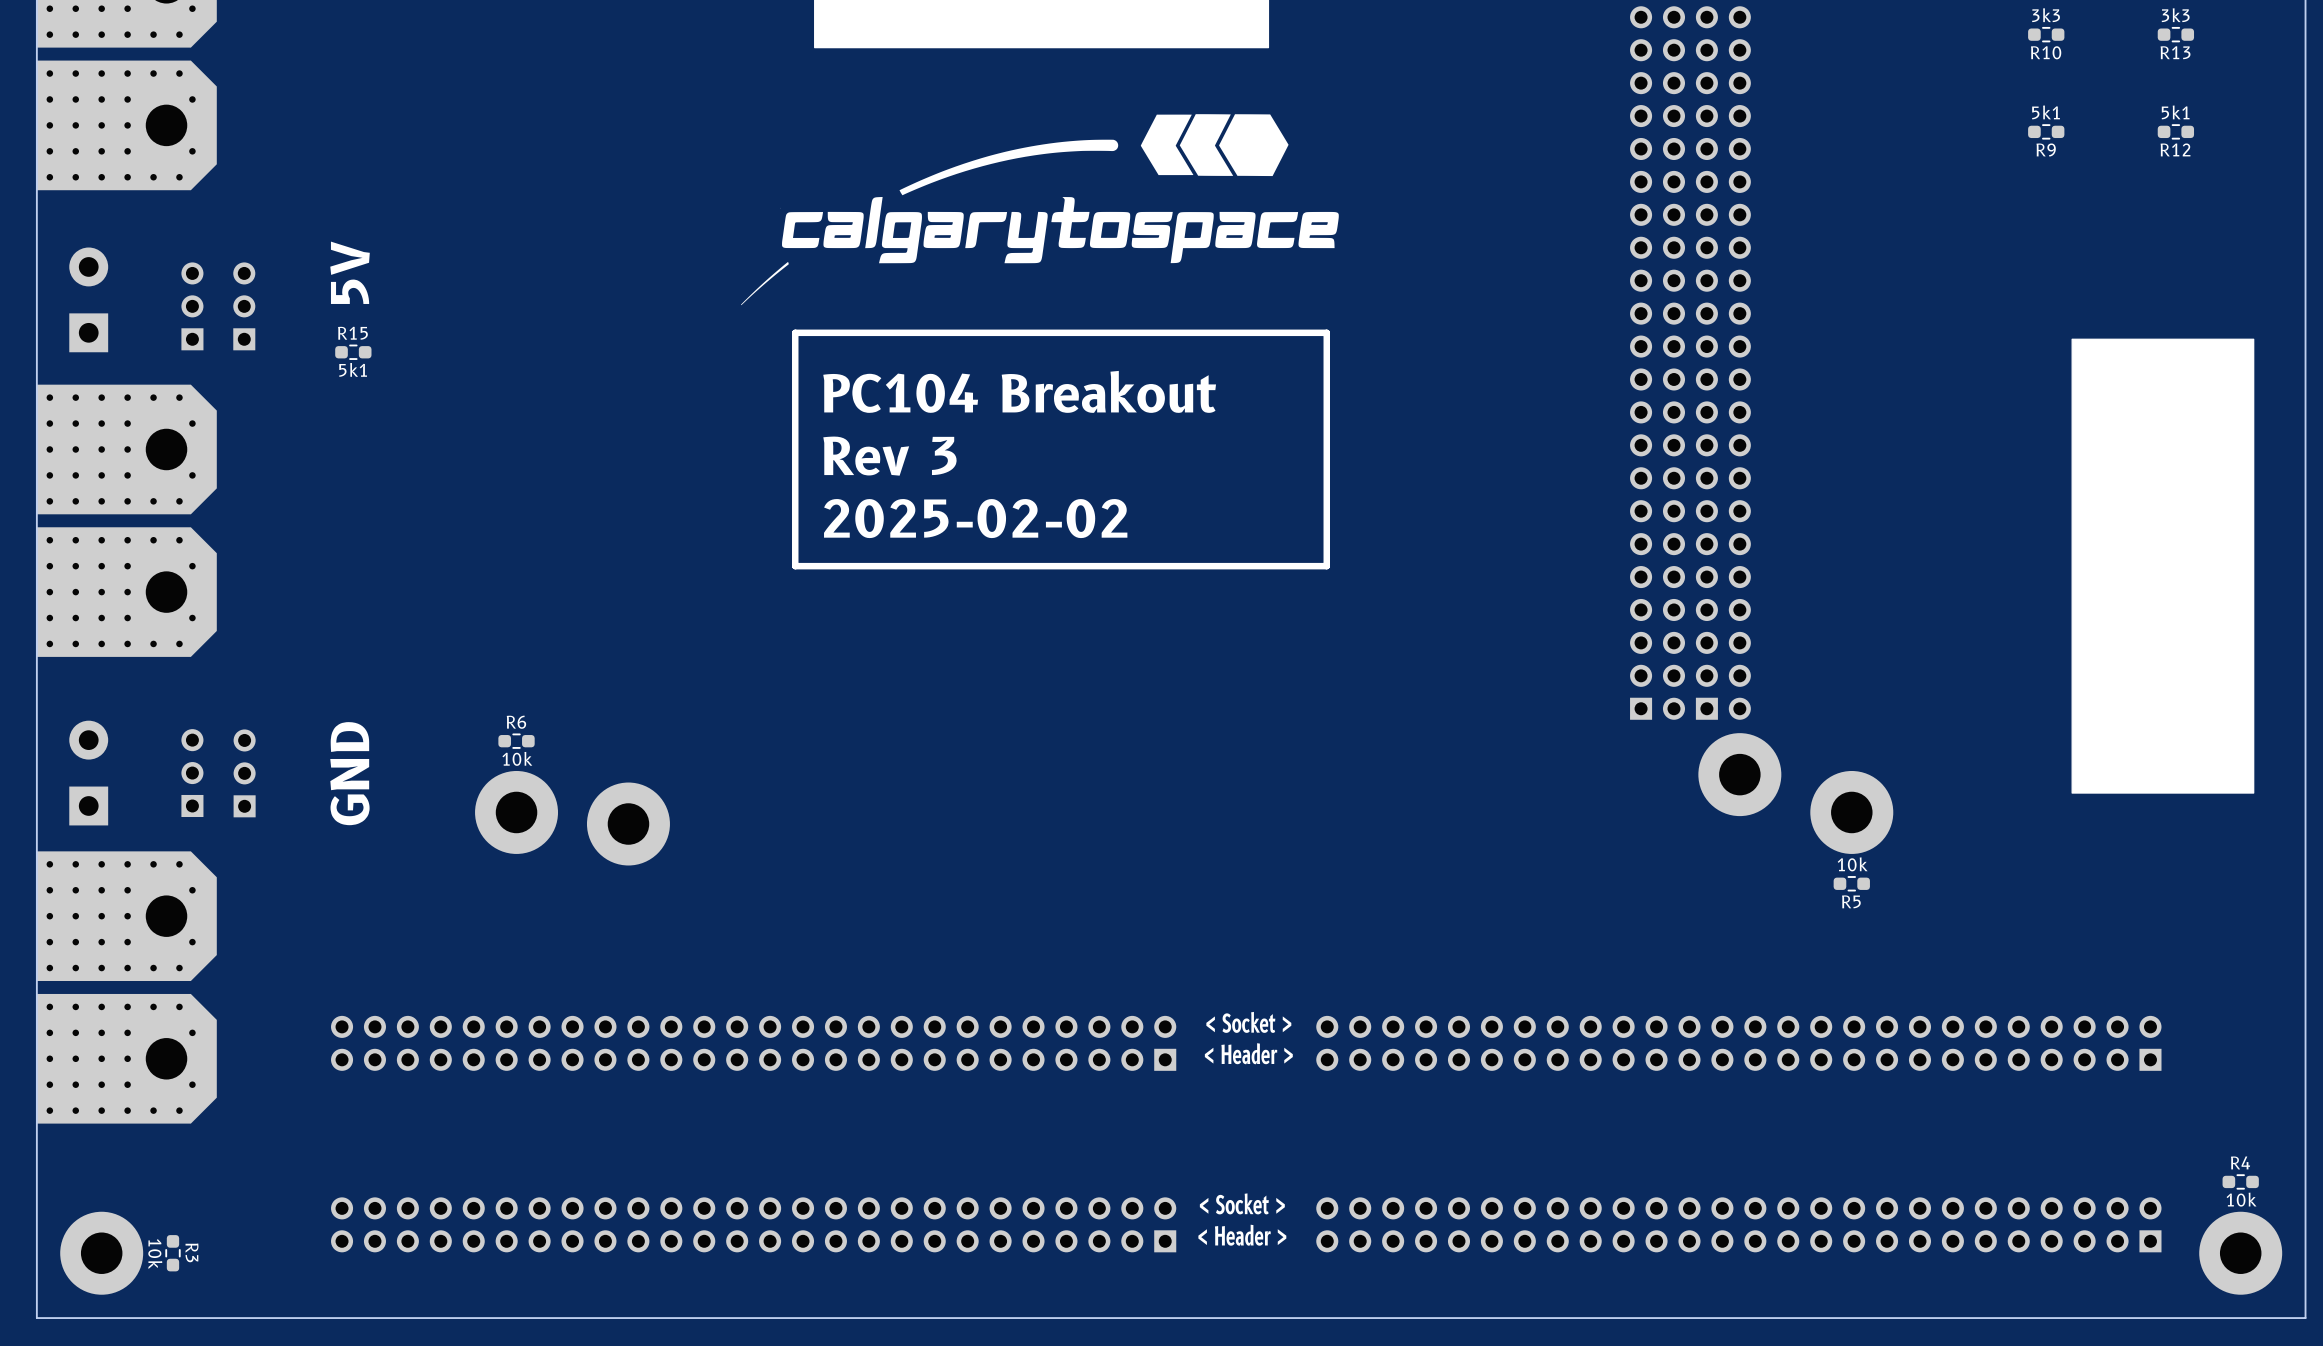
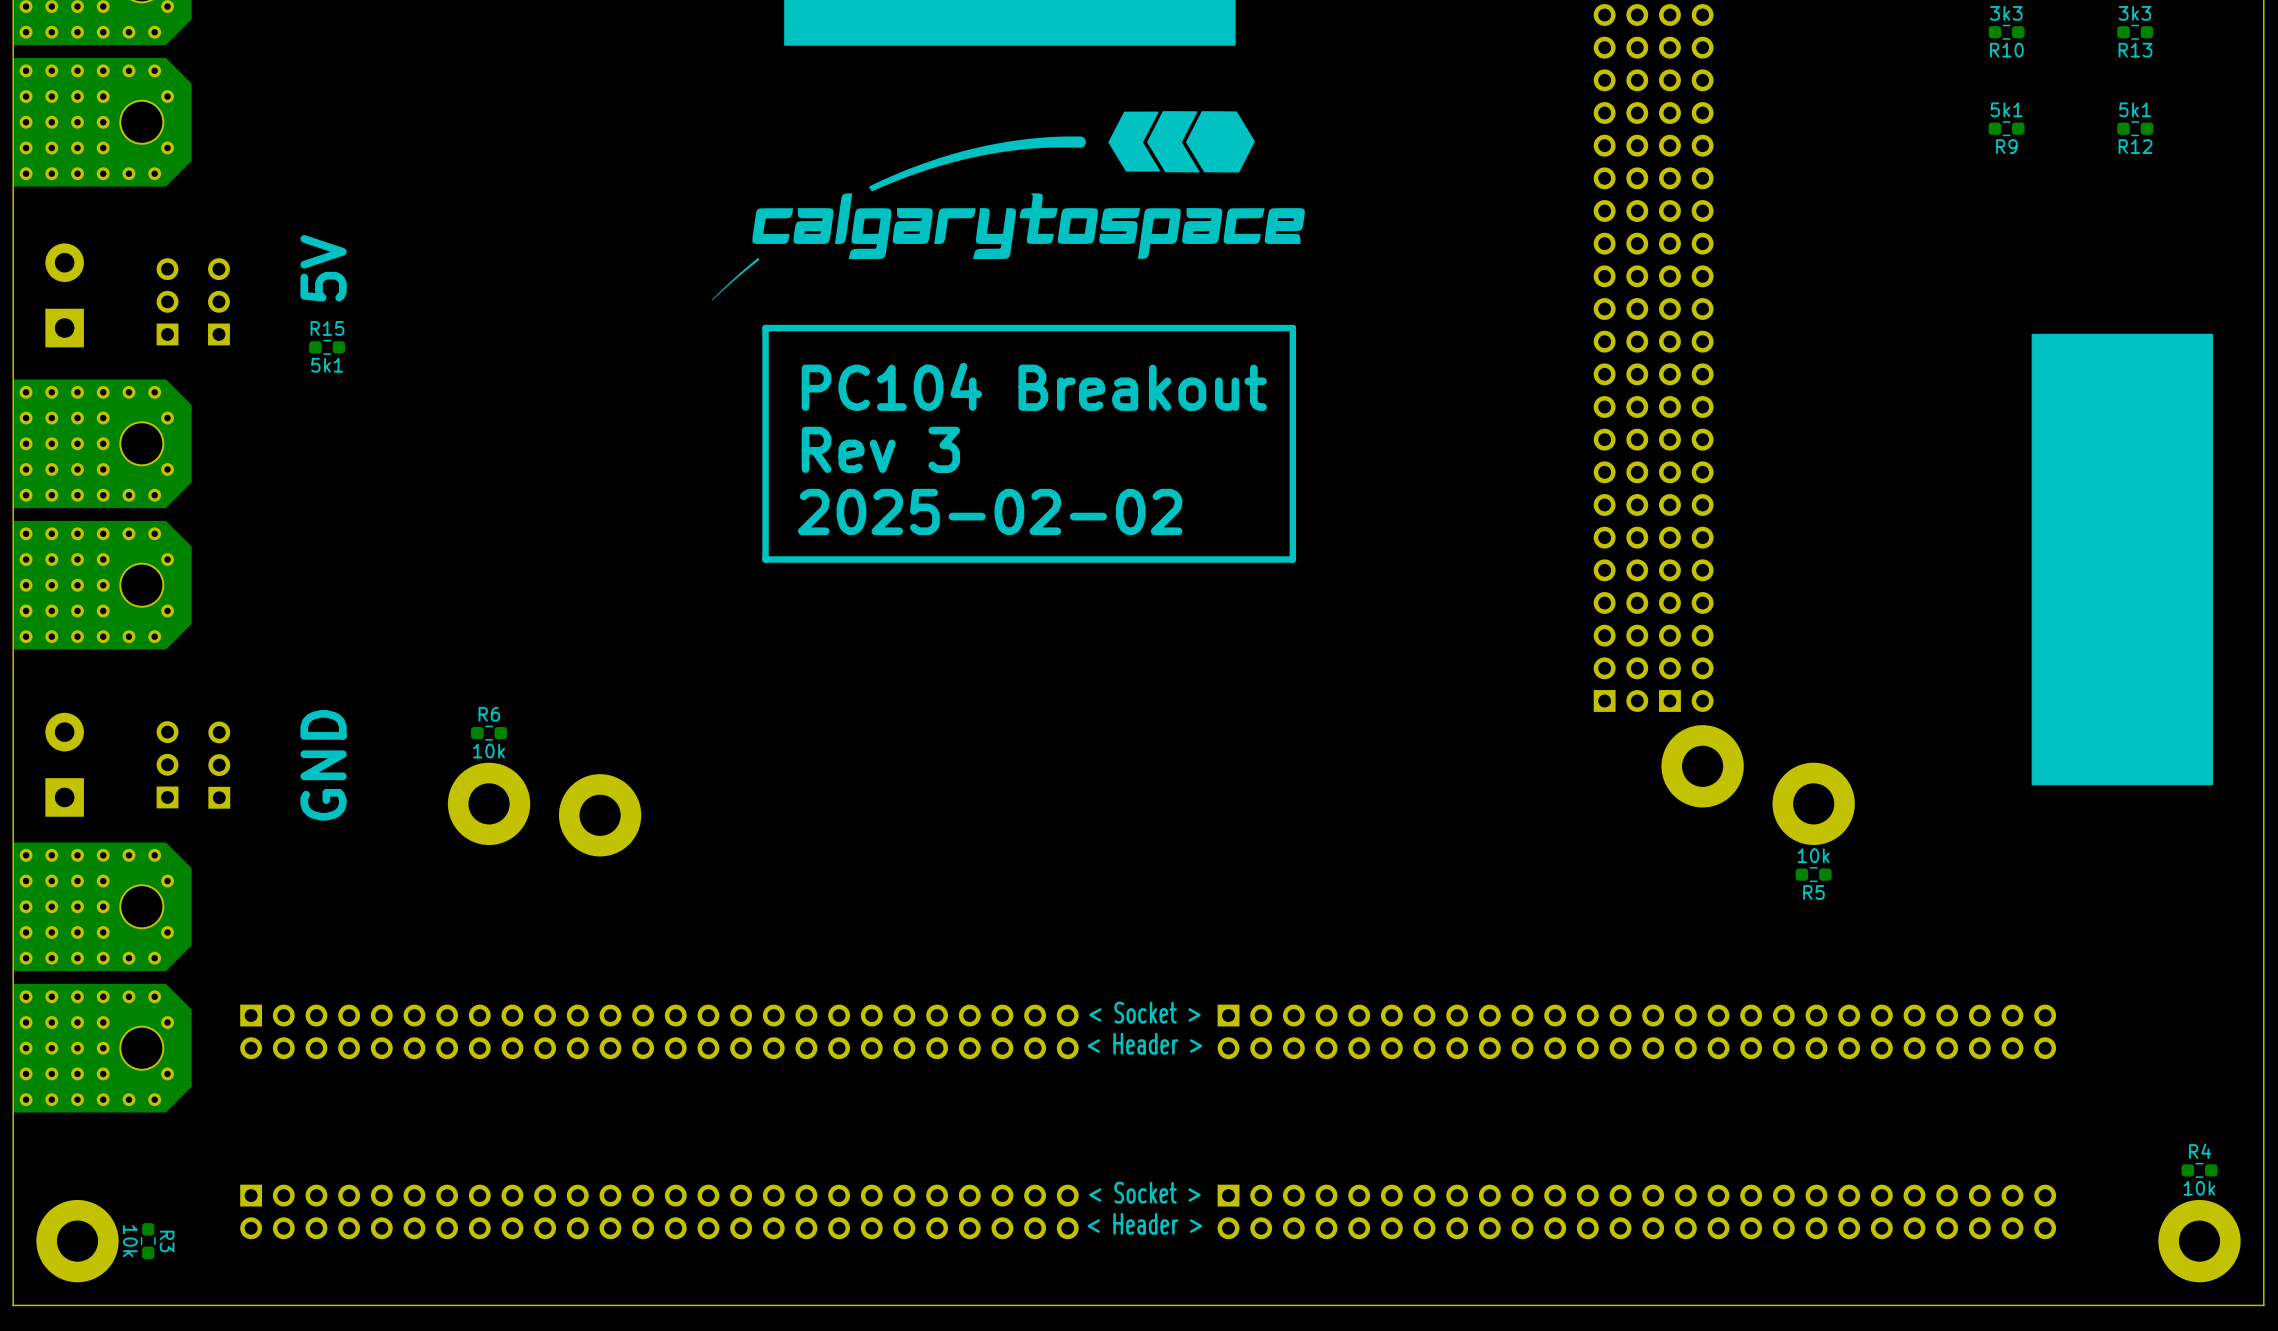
text position: < Socket > (1248, 1022) -> < Socket > (1144, 1012)
part rotation: 0° (753, 1043) -> 180° (659, 1031)
part rotation: 0° (1738, 1043) -> 180° (1636, 1031)
text position: < Header > (1248, 1053) -> < Header > (1144, 1043)
text position: < Socket > (1242, 1203) -> < Socket > (1144, 1192)
part rotation: 0° (753, 1224) -> 180° (659, 1211)
part rotation: 0° (1738, 1224) -> 180° (1636, 1211)
text position: < Header > (1242, 1235) -> < Header > (1144, 1223)

